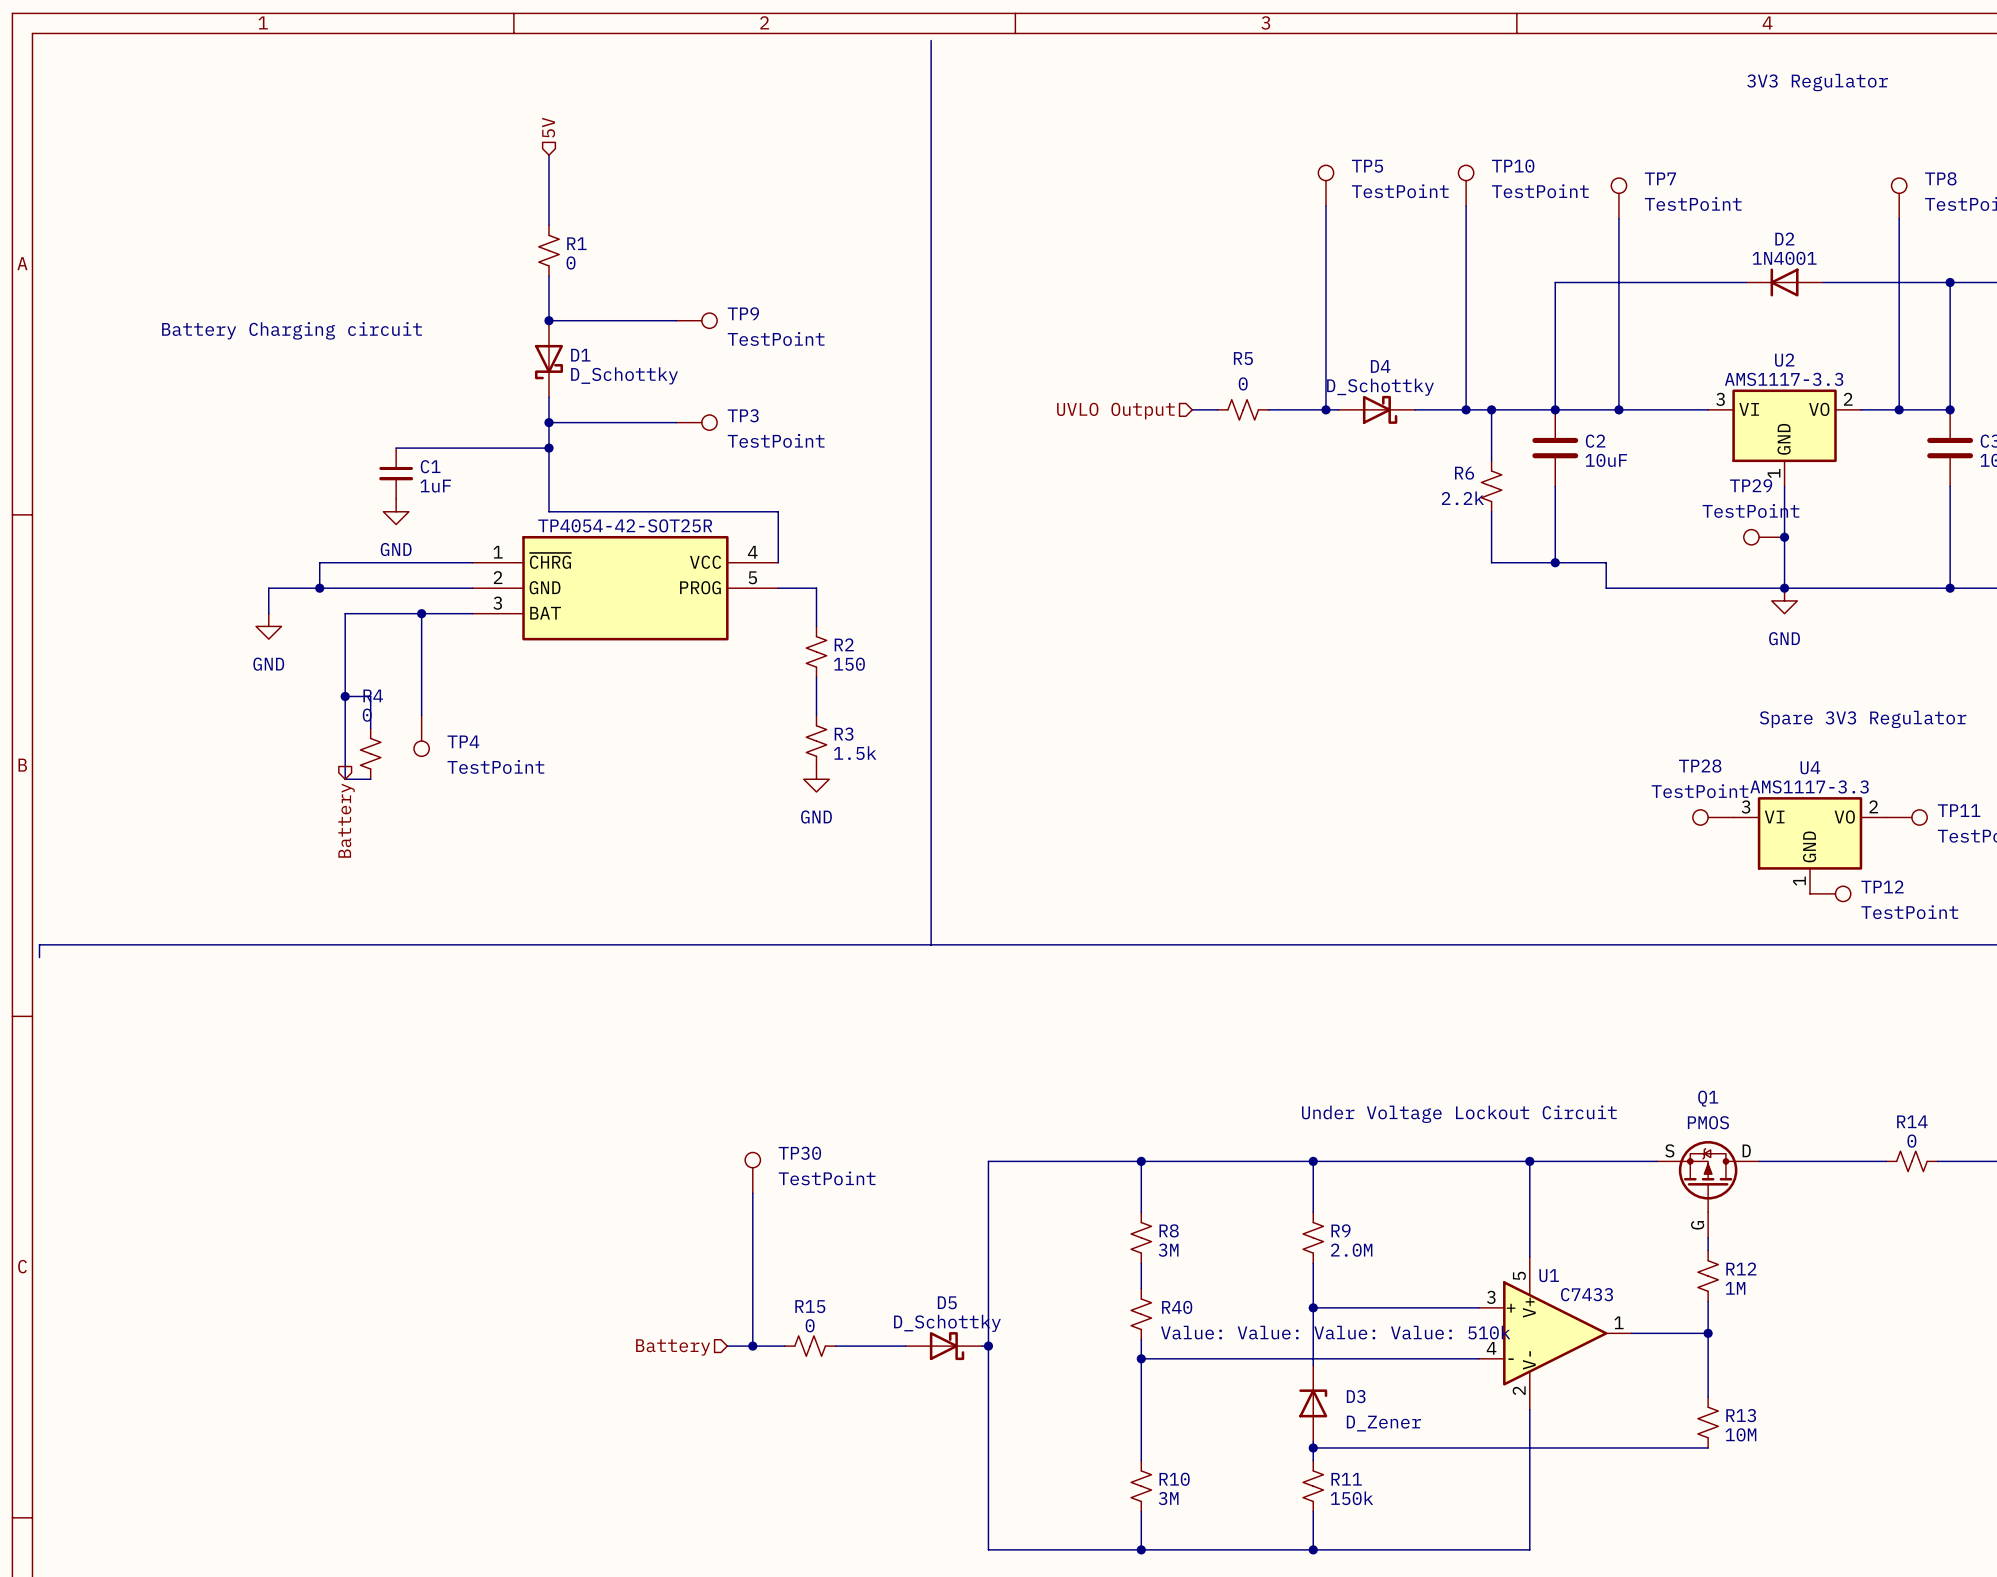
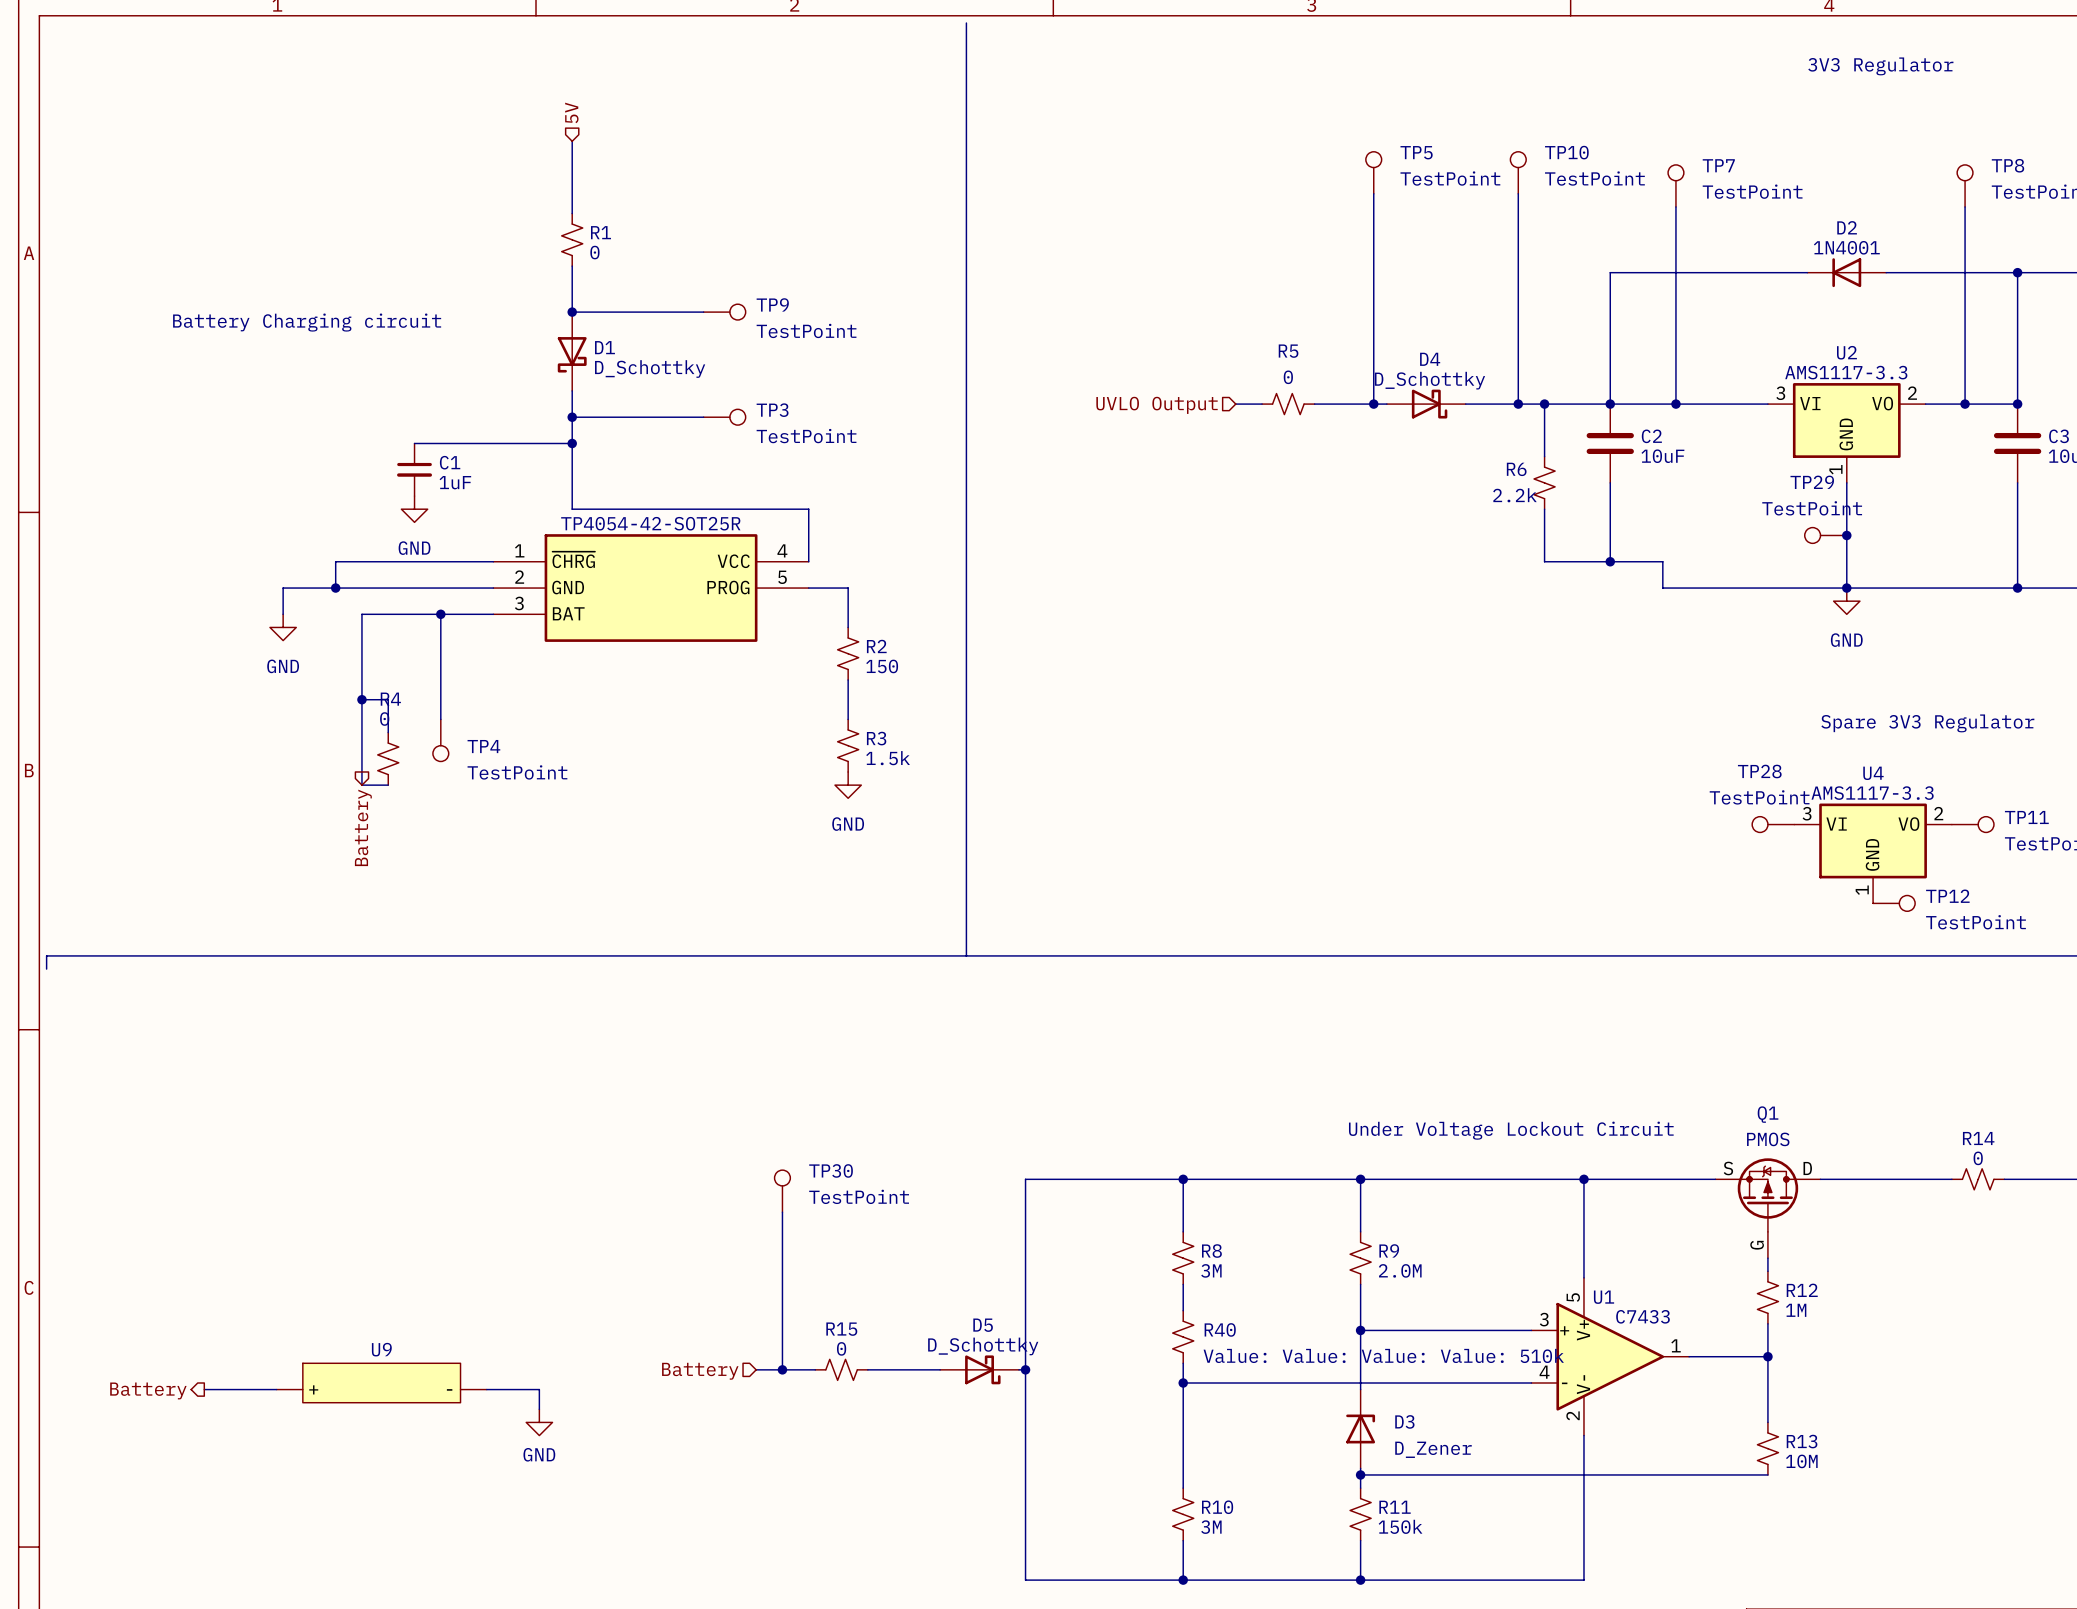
U9: none -> (381, 1383)
wire: none -> (204, 1389) (276, 1389)
wire: none -> (486, 1389) (539, 1389) (539, 1409)
hierarchical label: none -> Battery (148, 1390)
power symbol: none -> GND (539, 1422)

